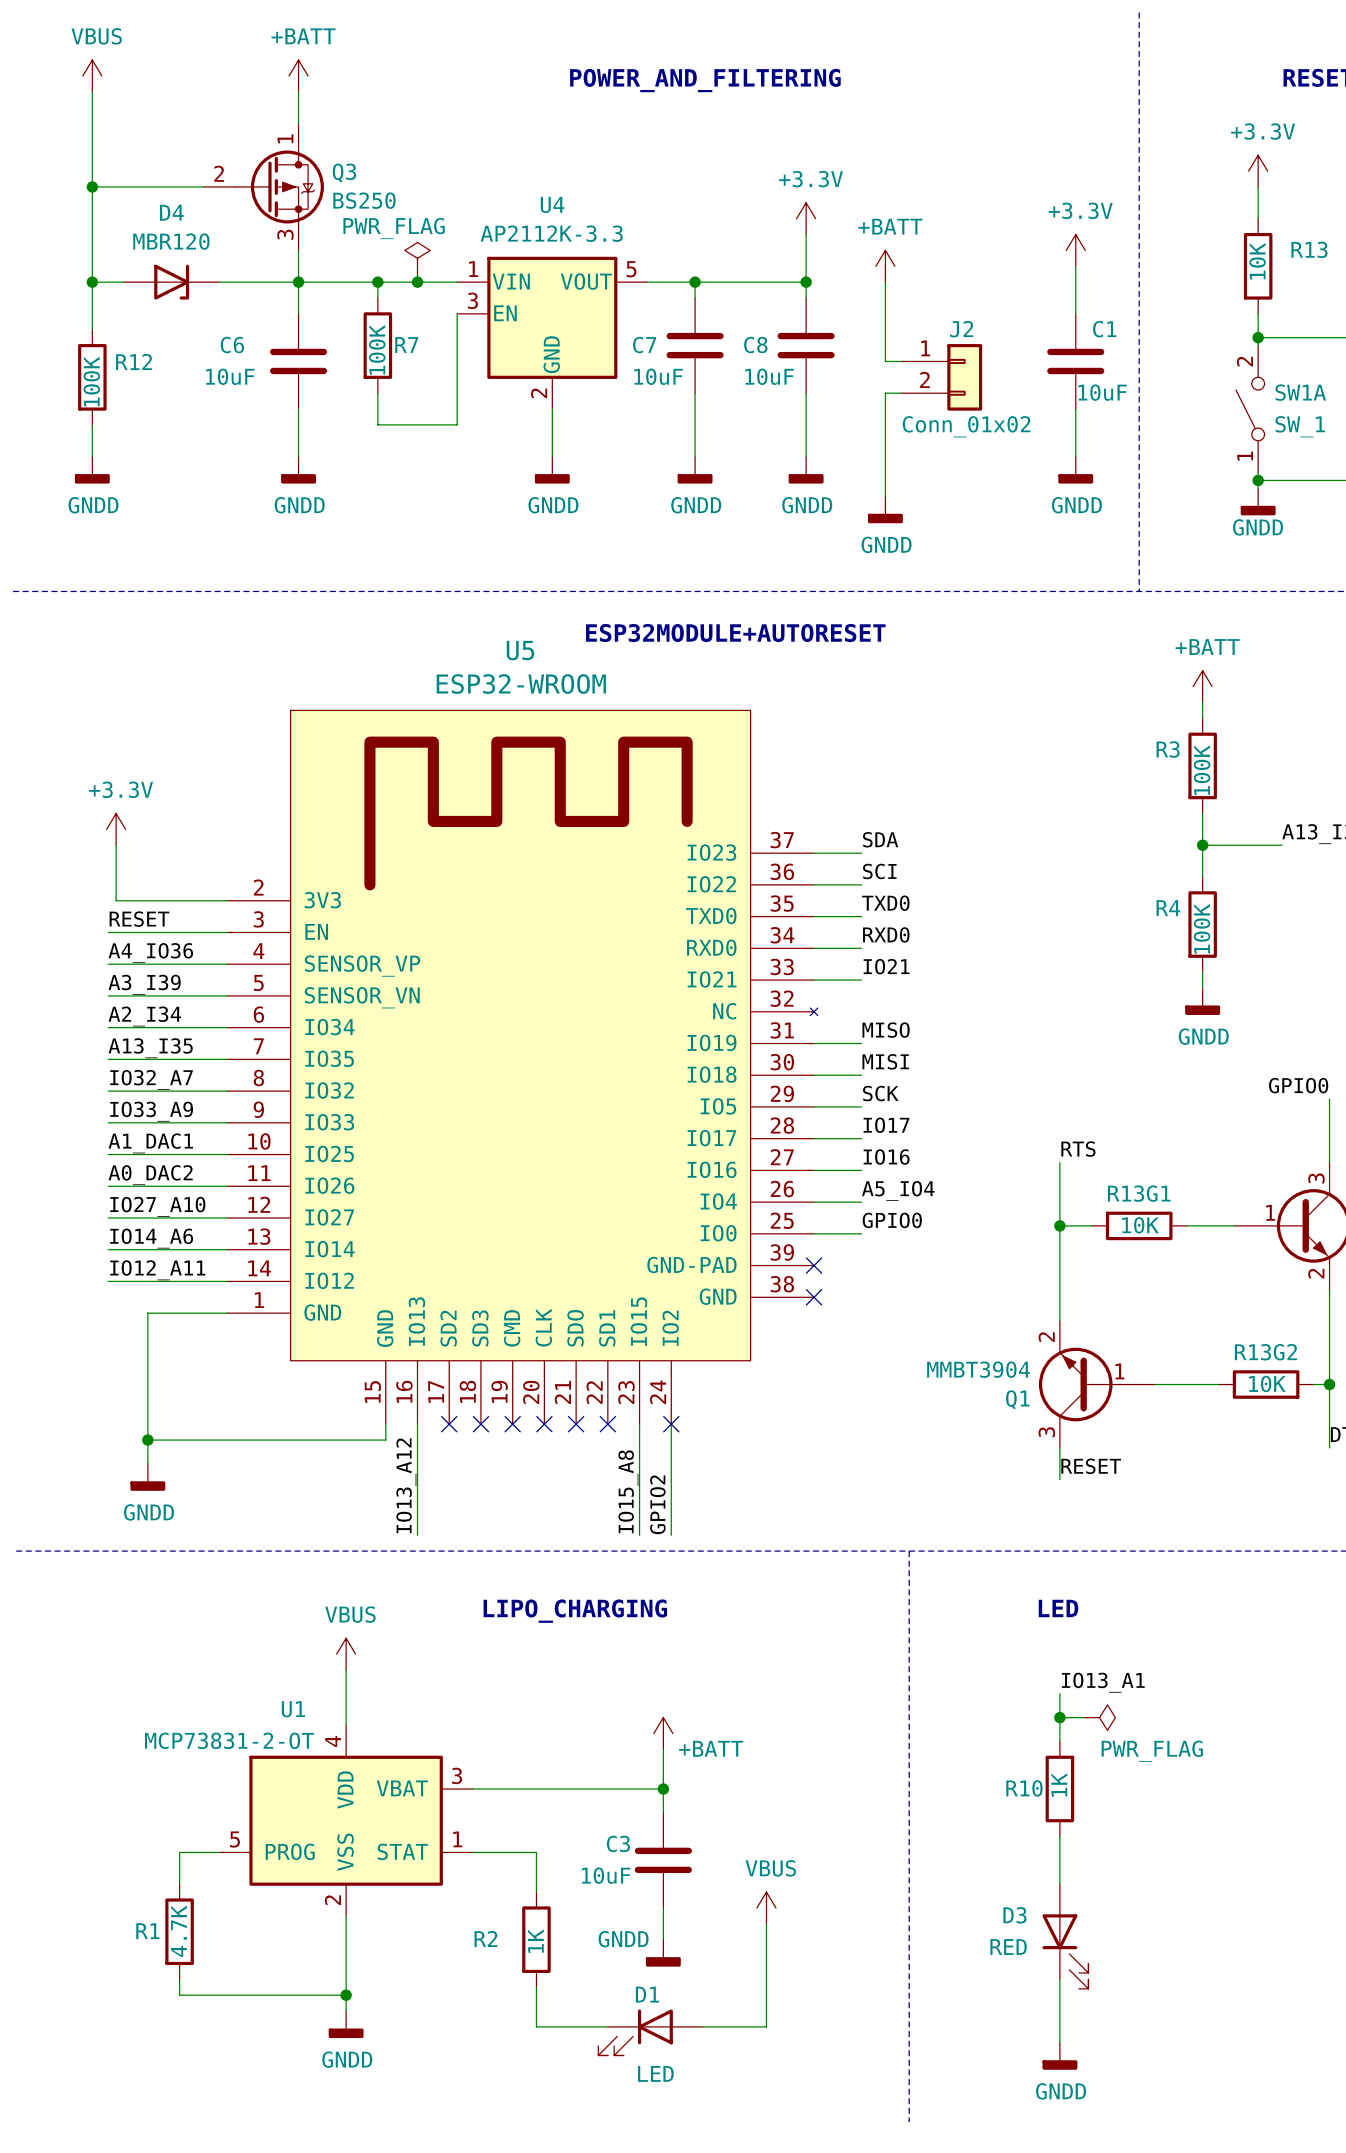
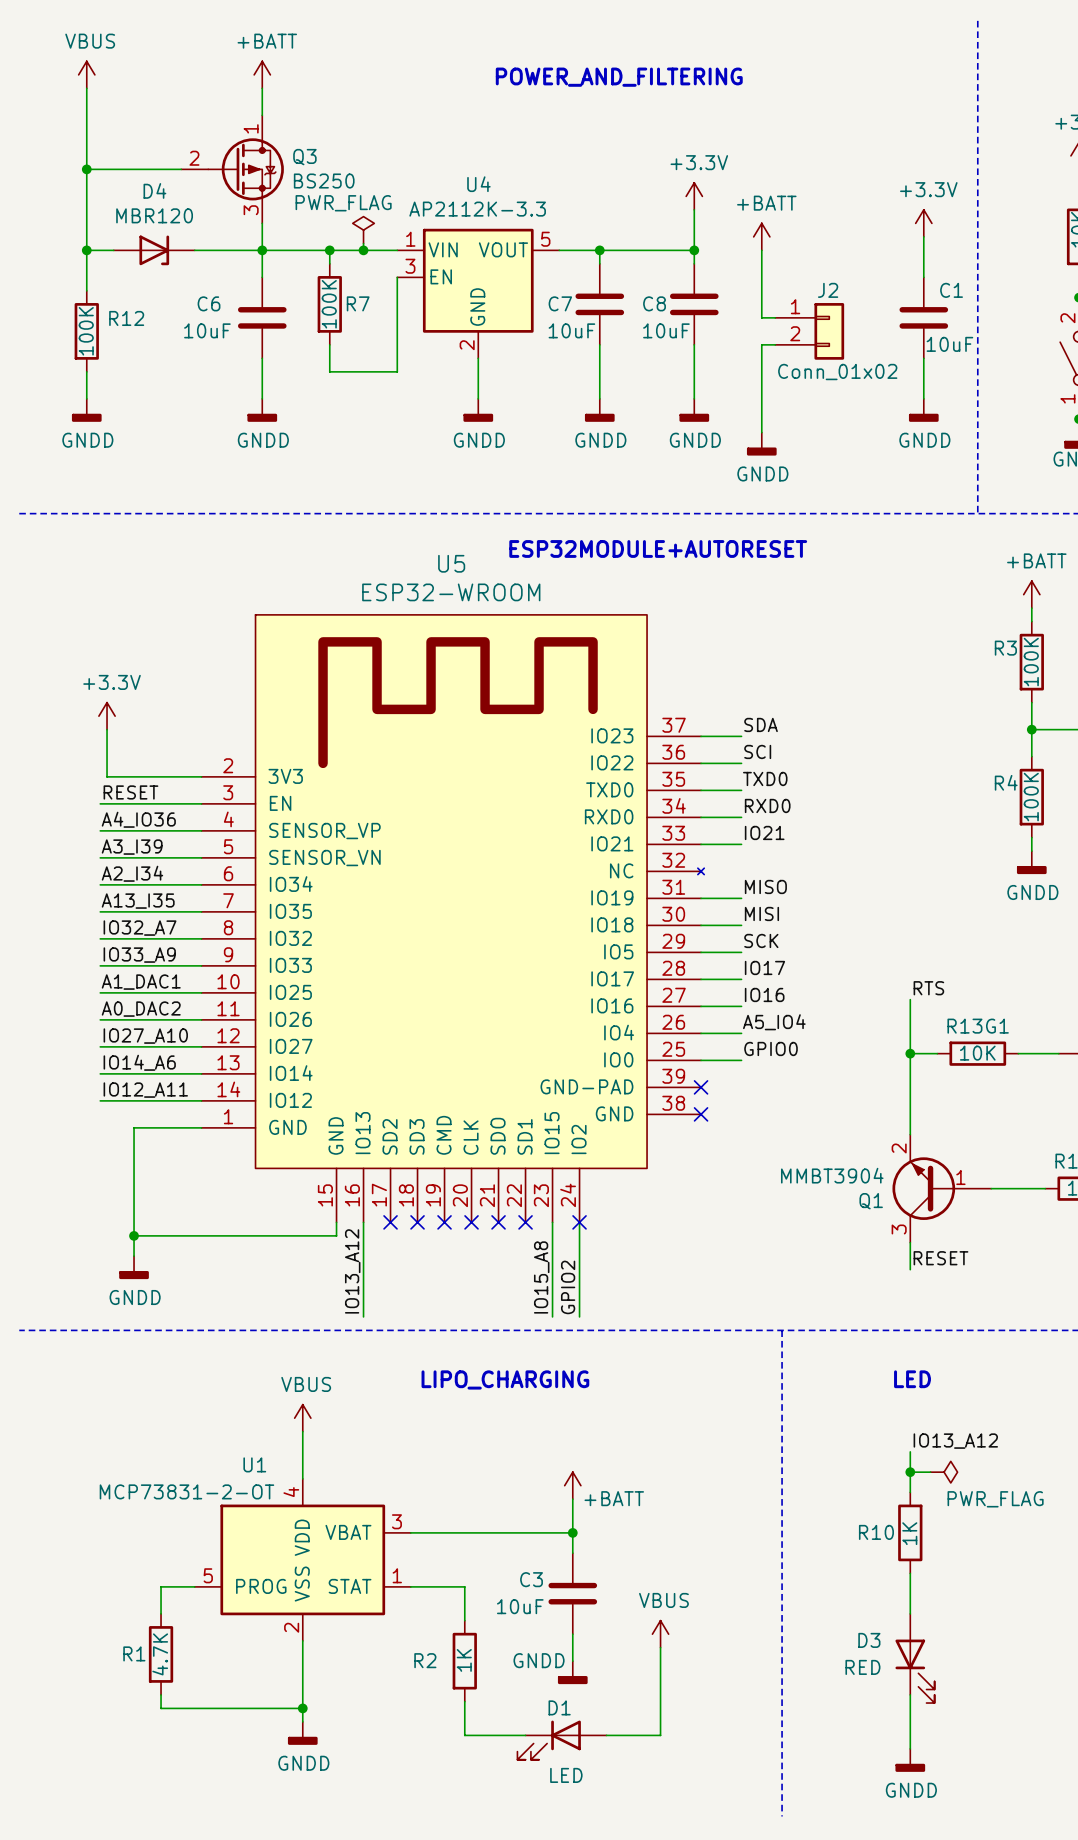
label: IO13_A1 (1103, 1682) -> IO13_A12 (955, 1441)

